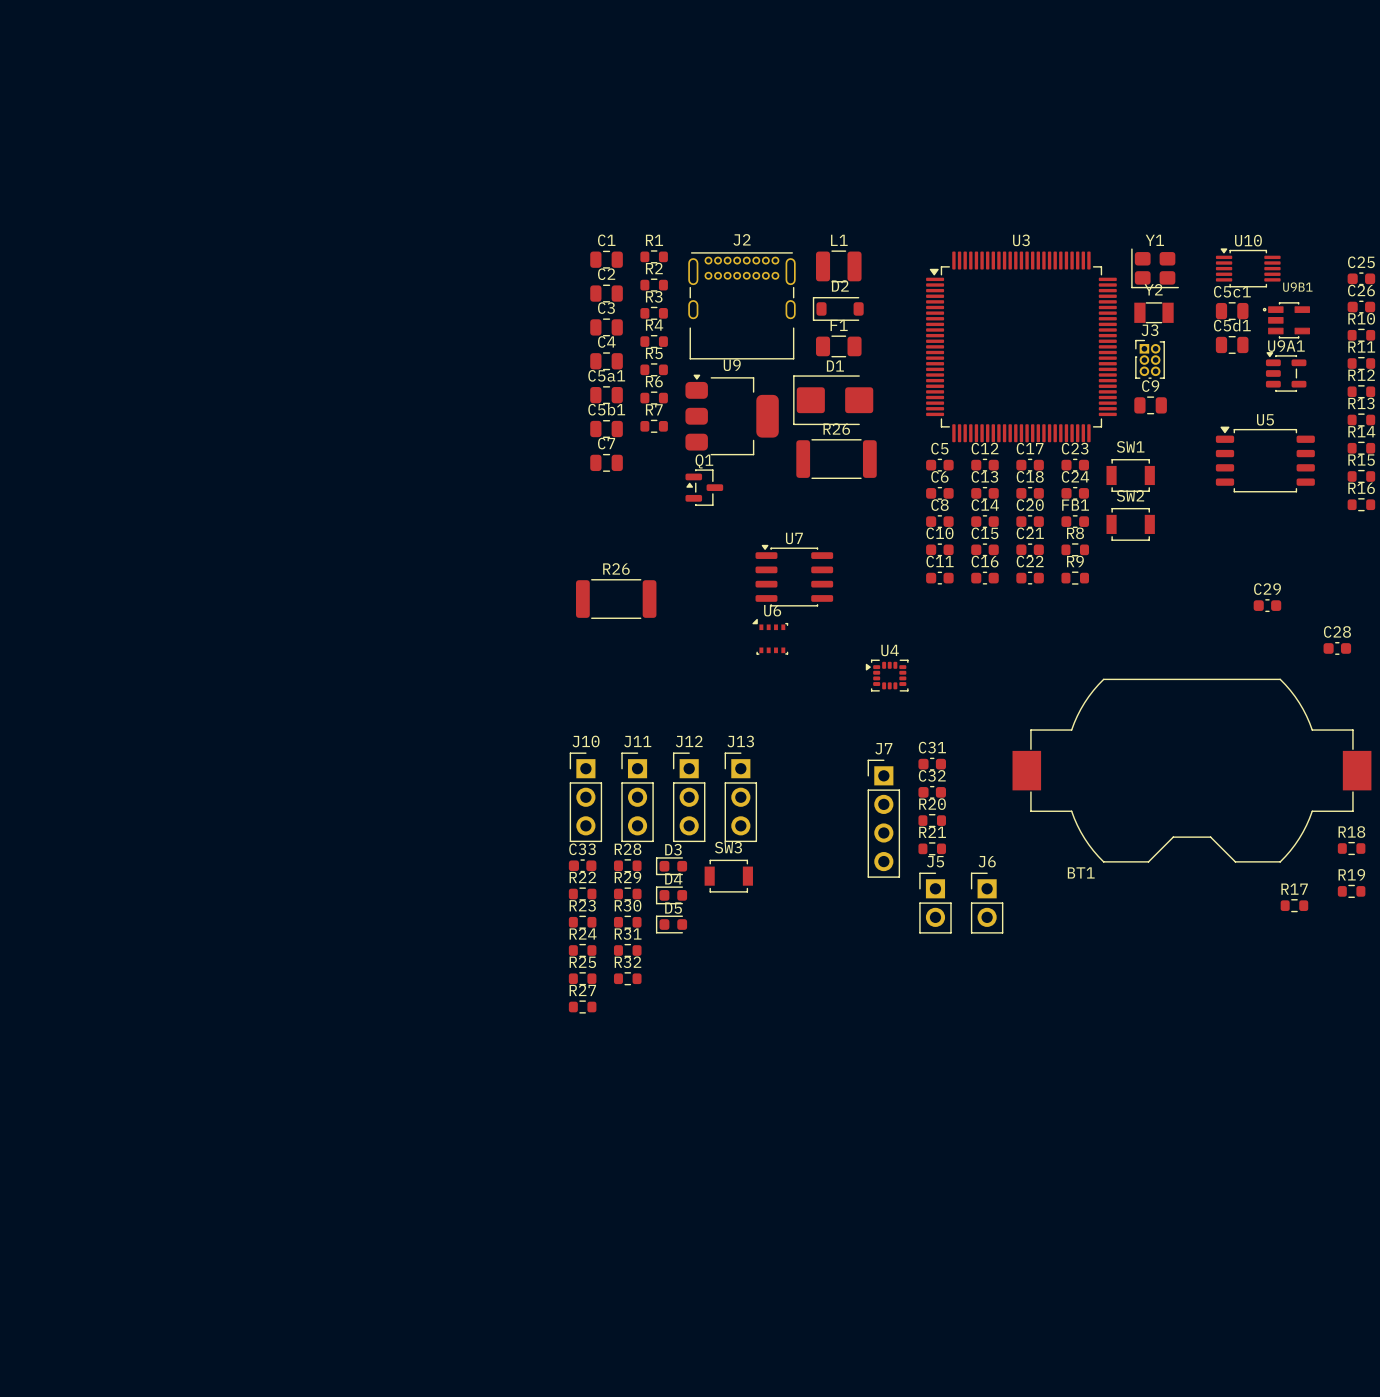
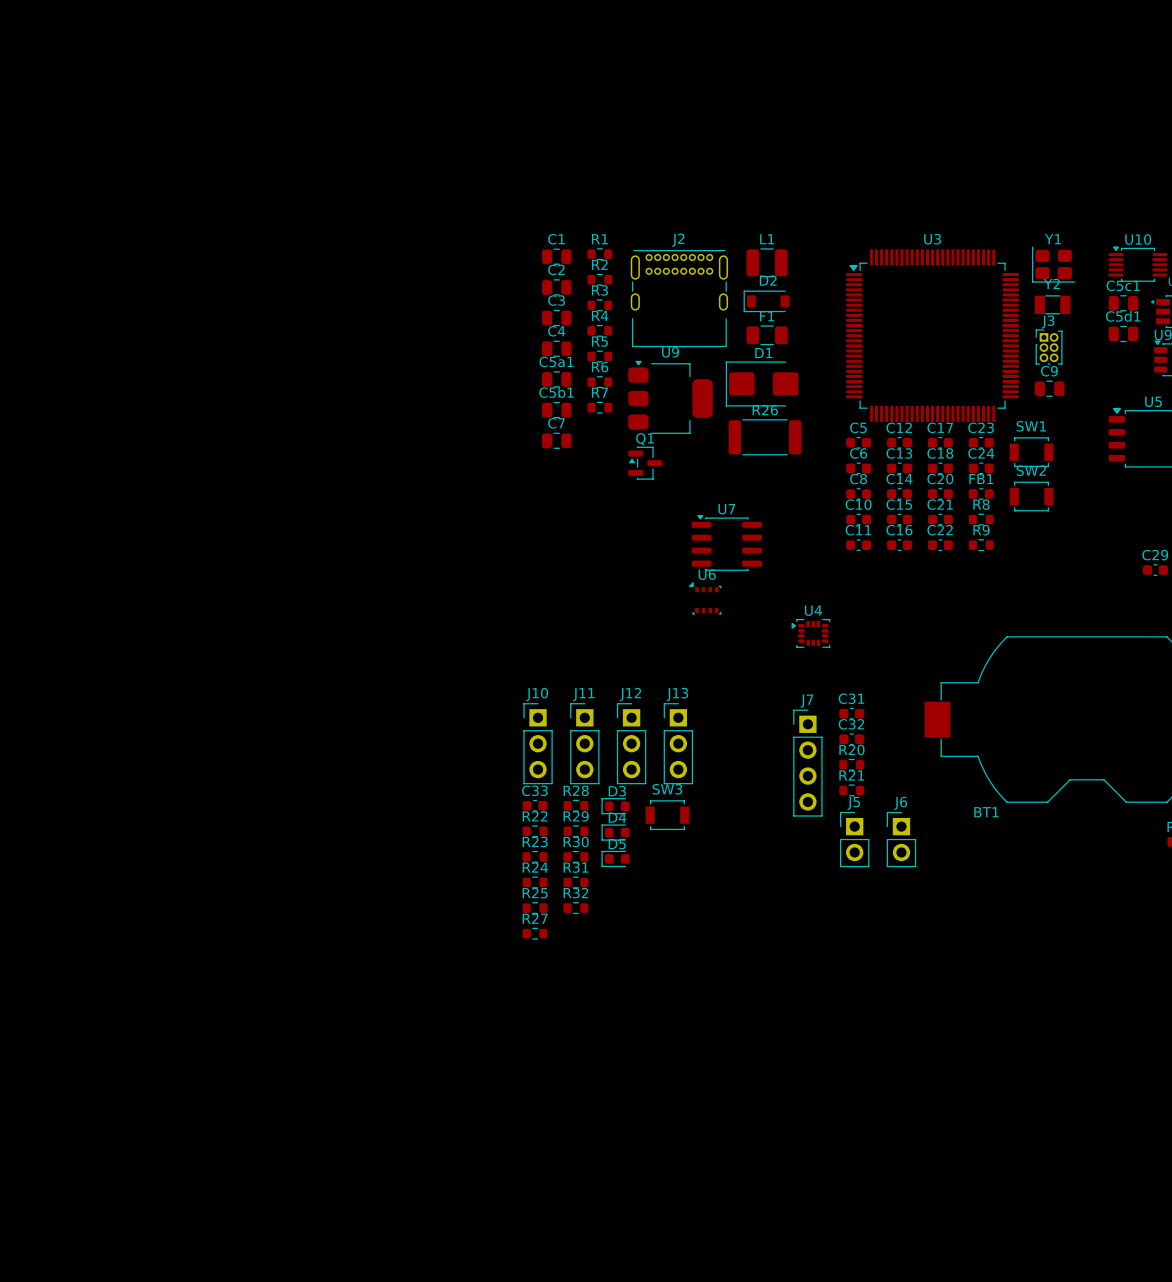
R26: (616, 599) -> none

